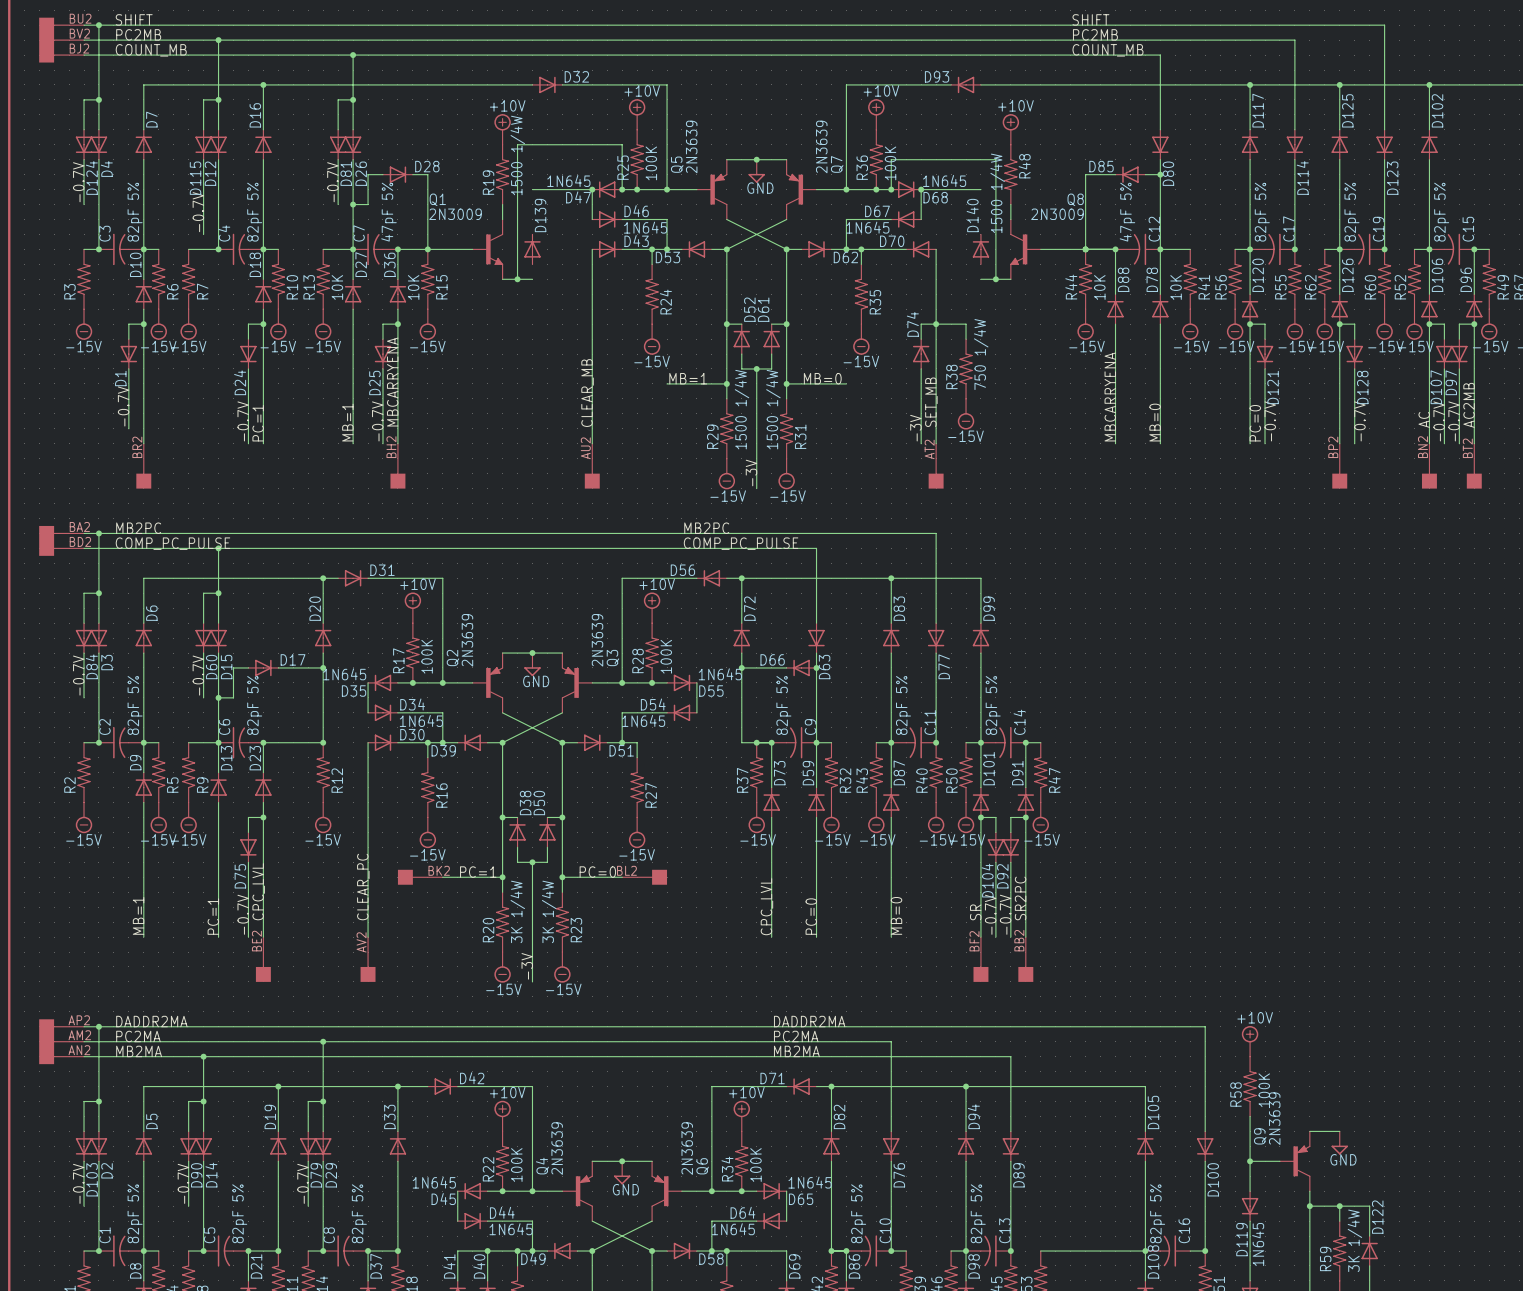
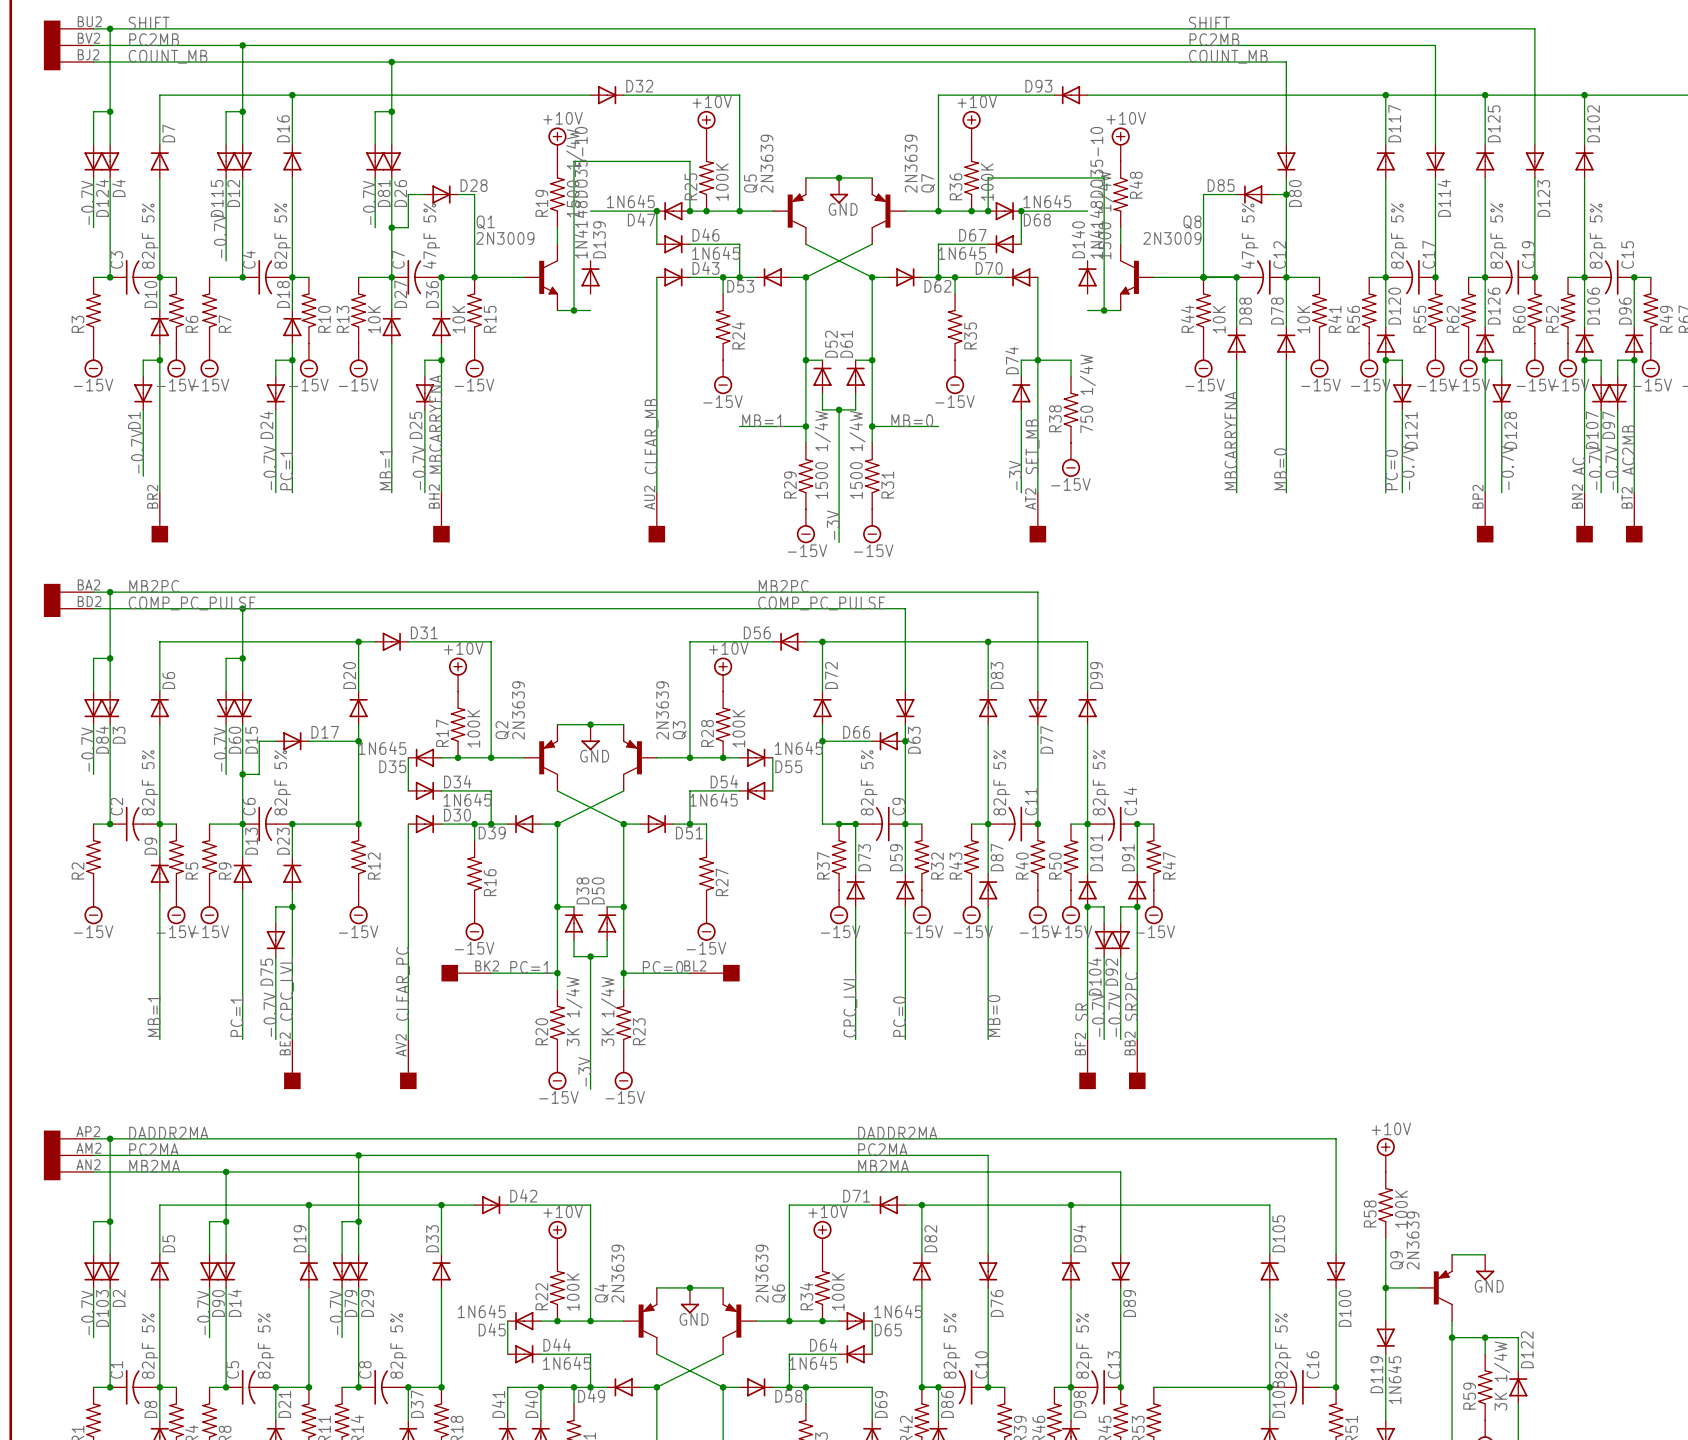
D139 value: none -> 1N4148DO35-10 (581, 192)
D140 value: none -> 1N4148DO35-10 (1096, 192)

